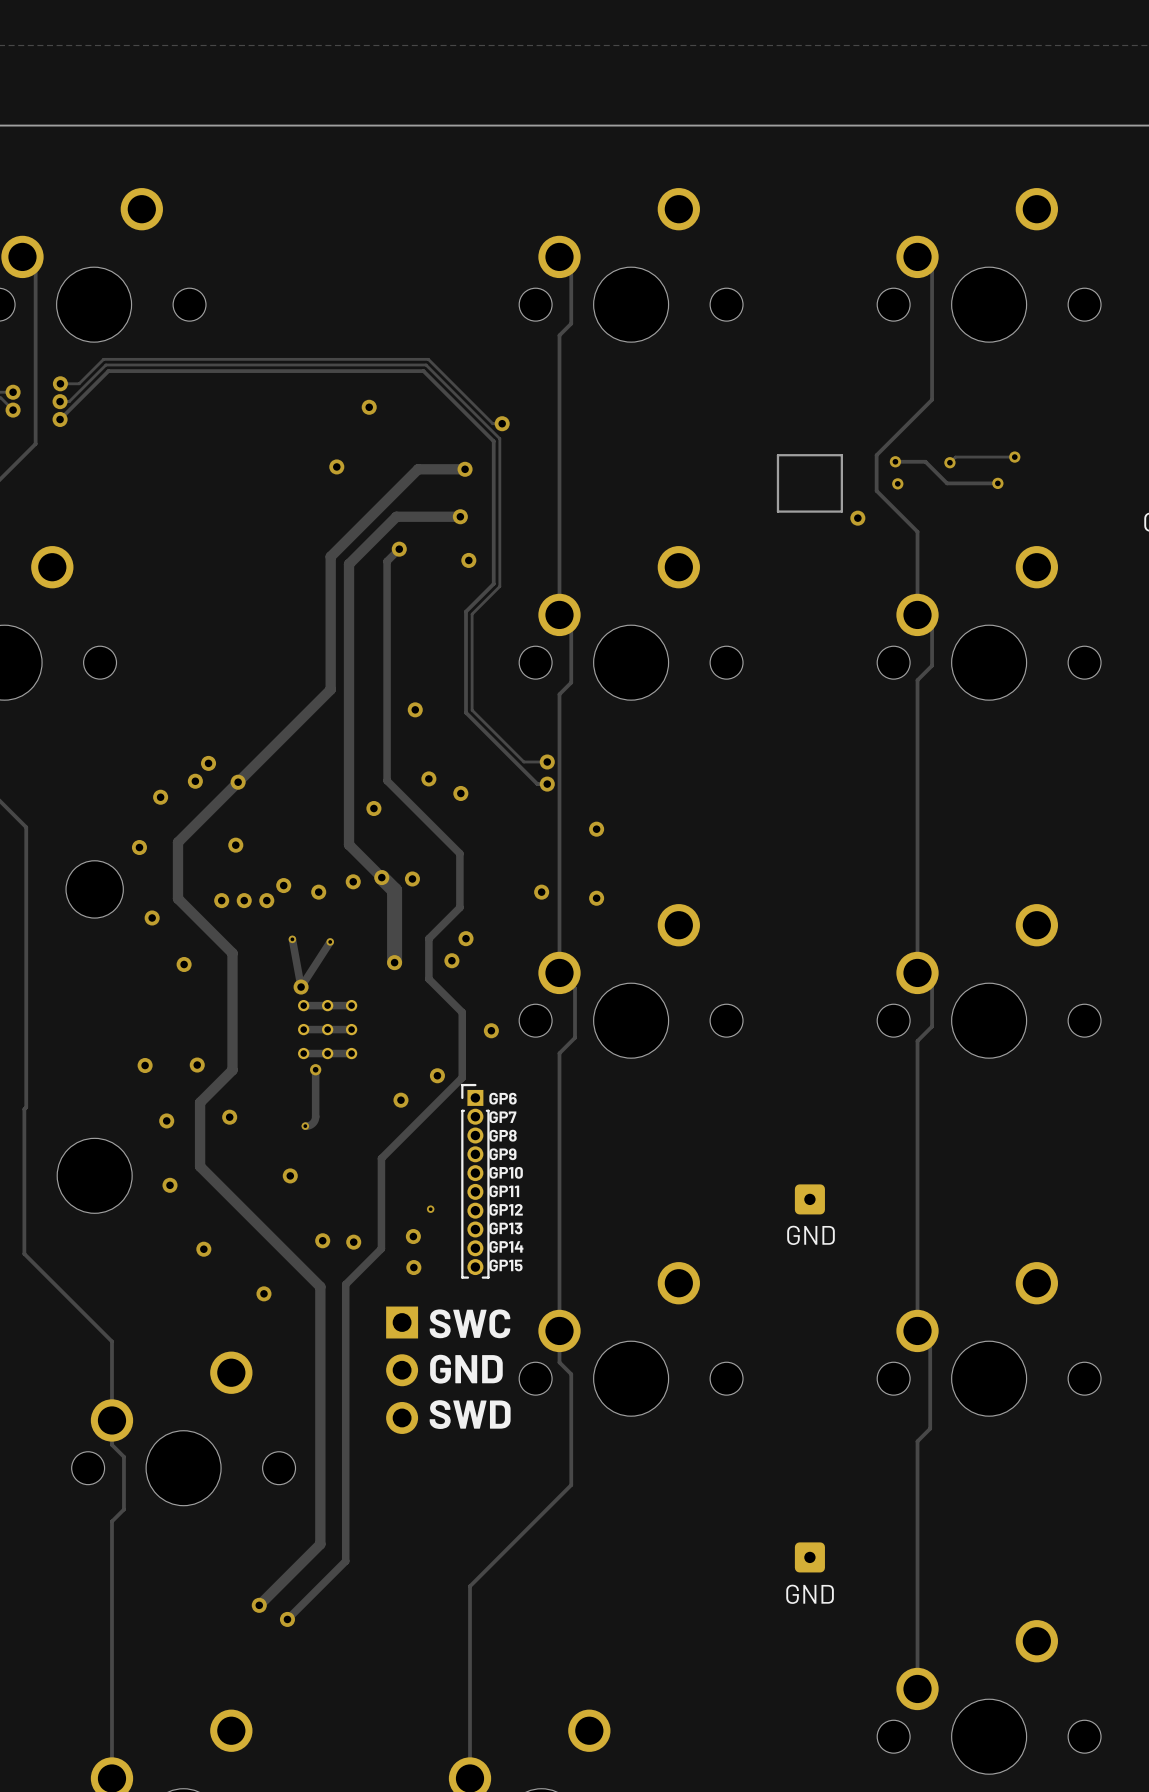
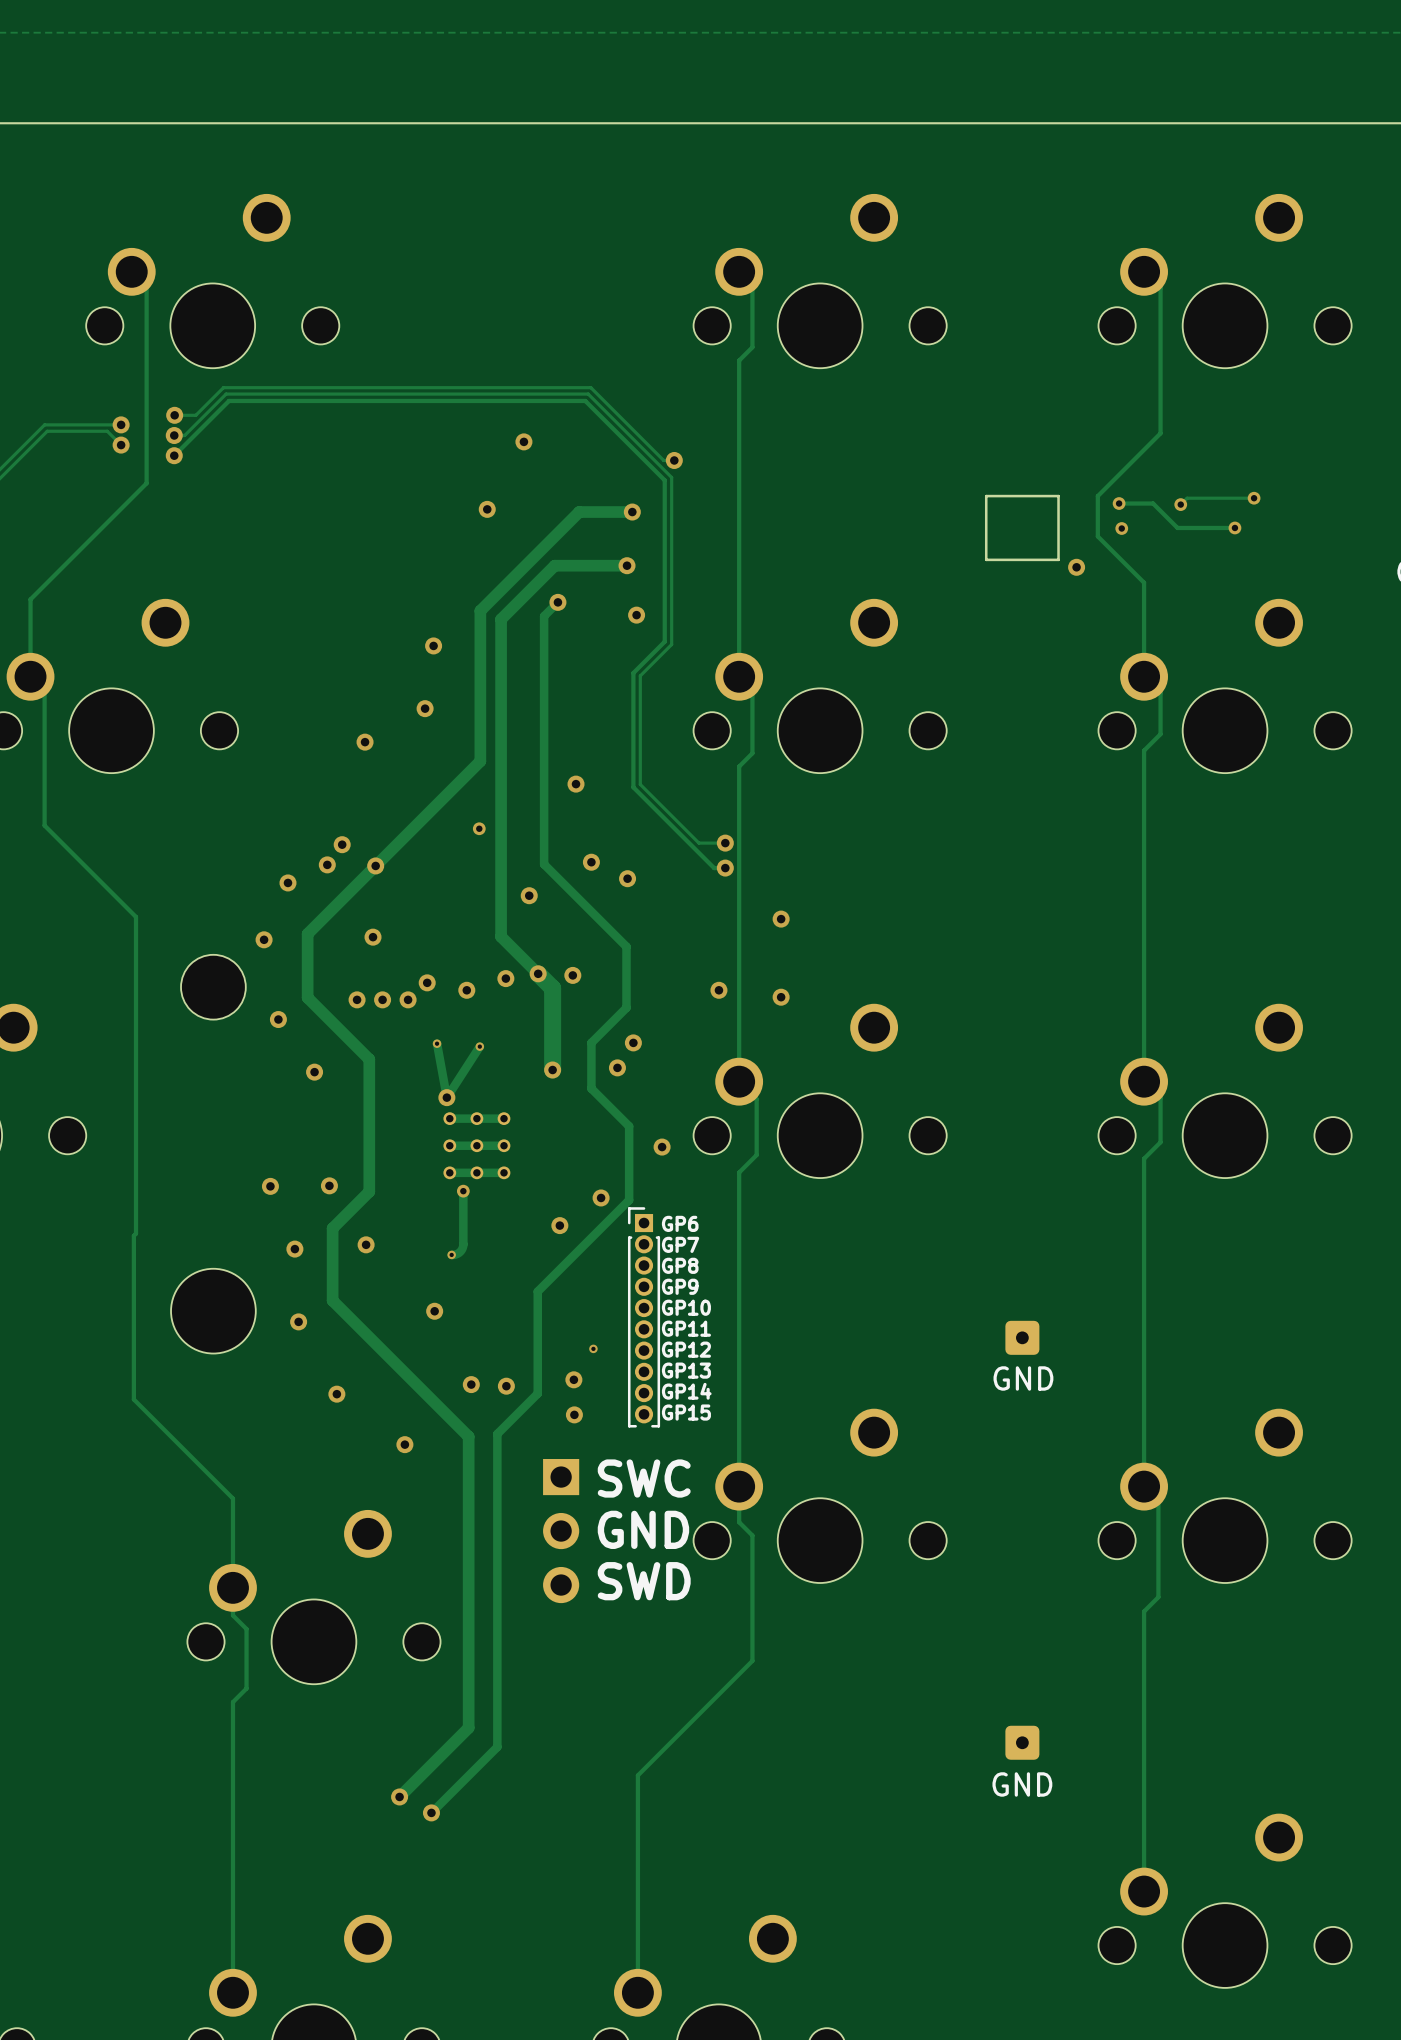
via: none -> (433, 645)
via: none -> (425, 708)
via: none -> (365, 742)
via: none -> (479, 828)

